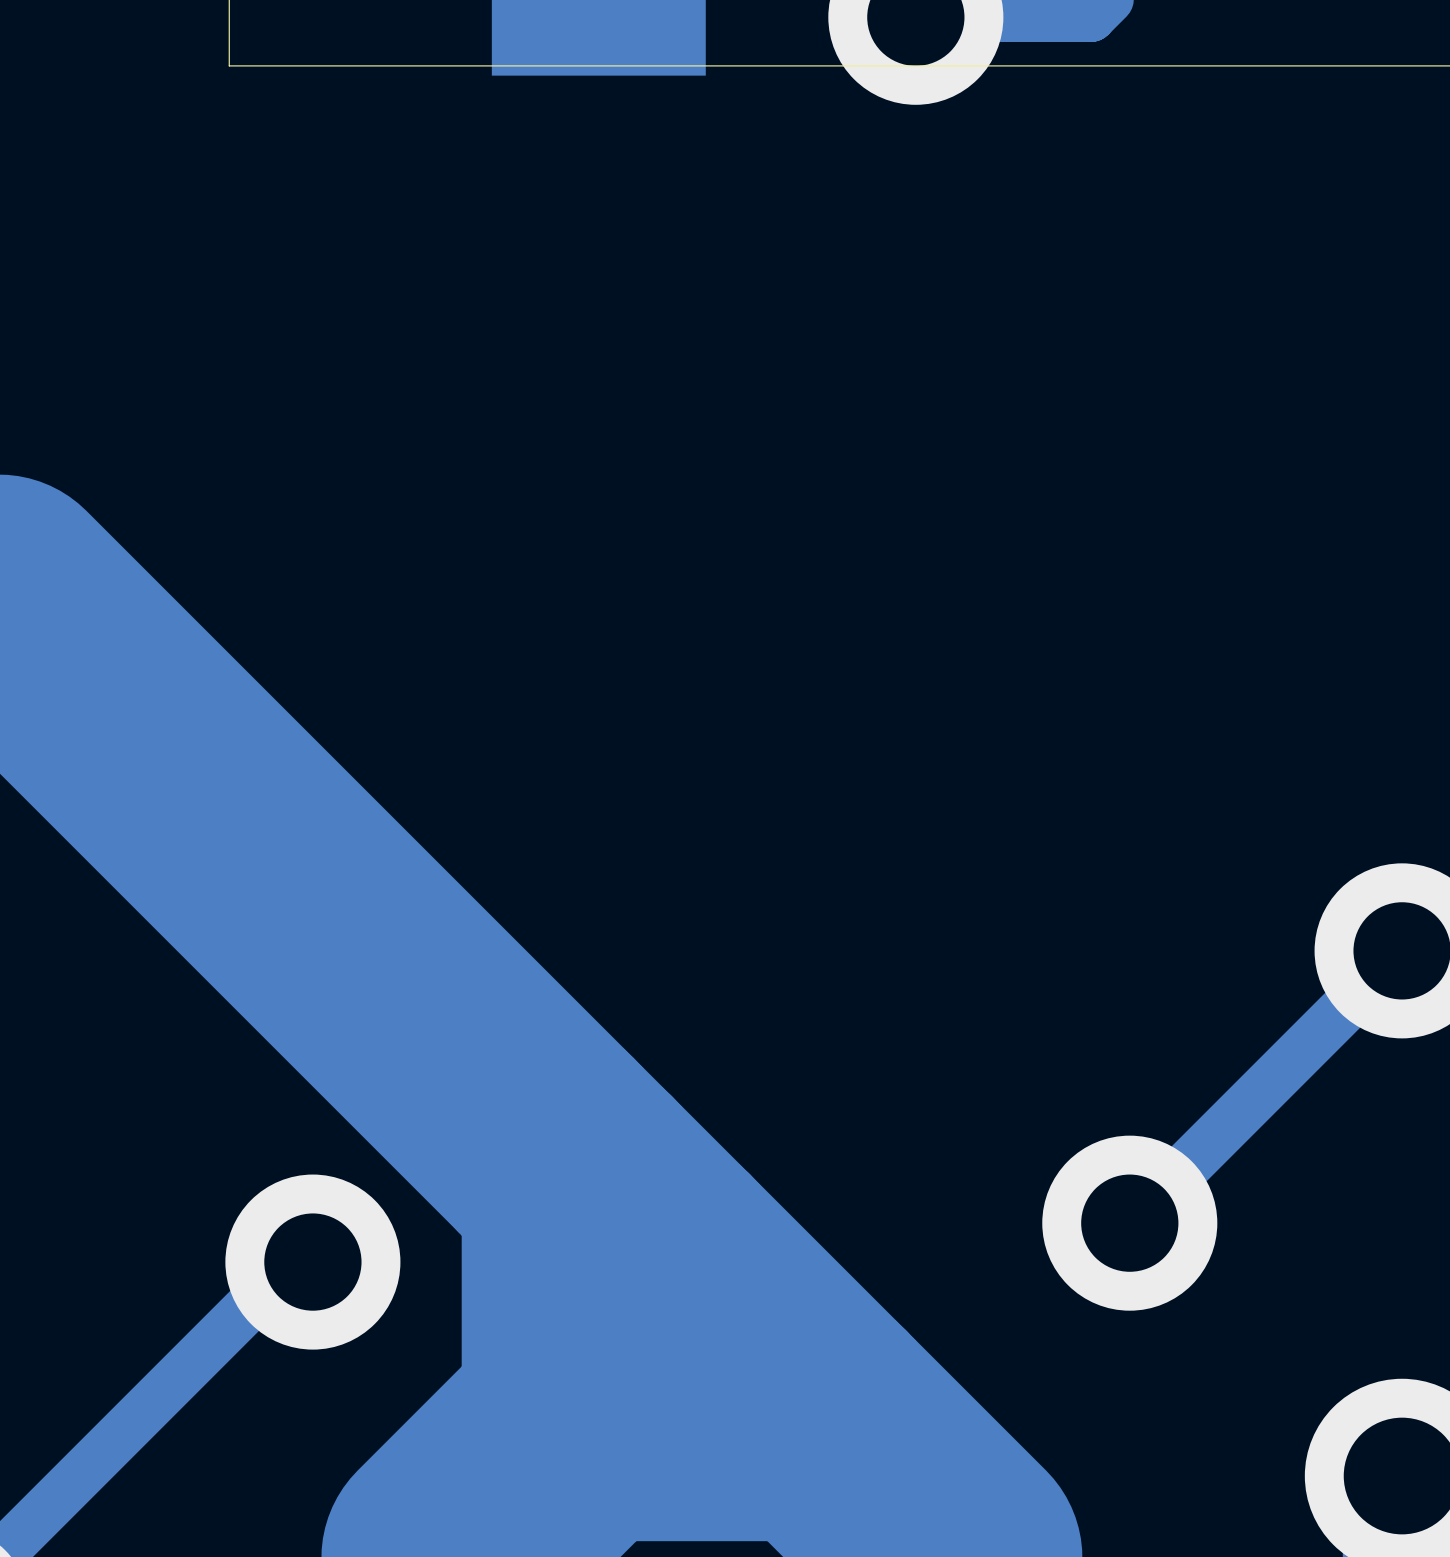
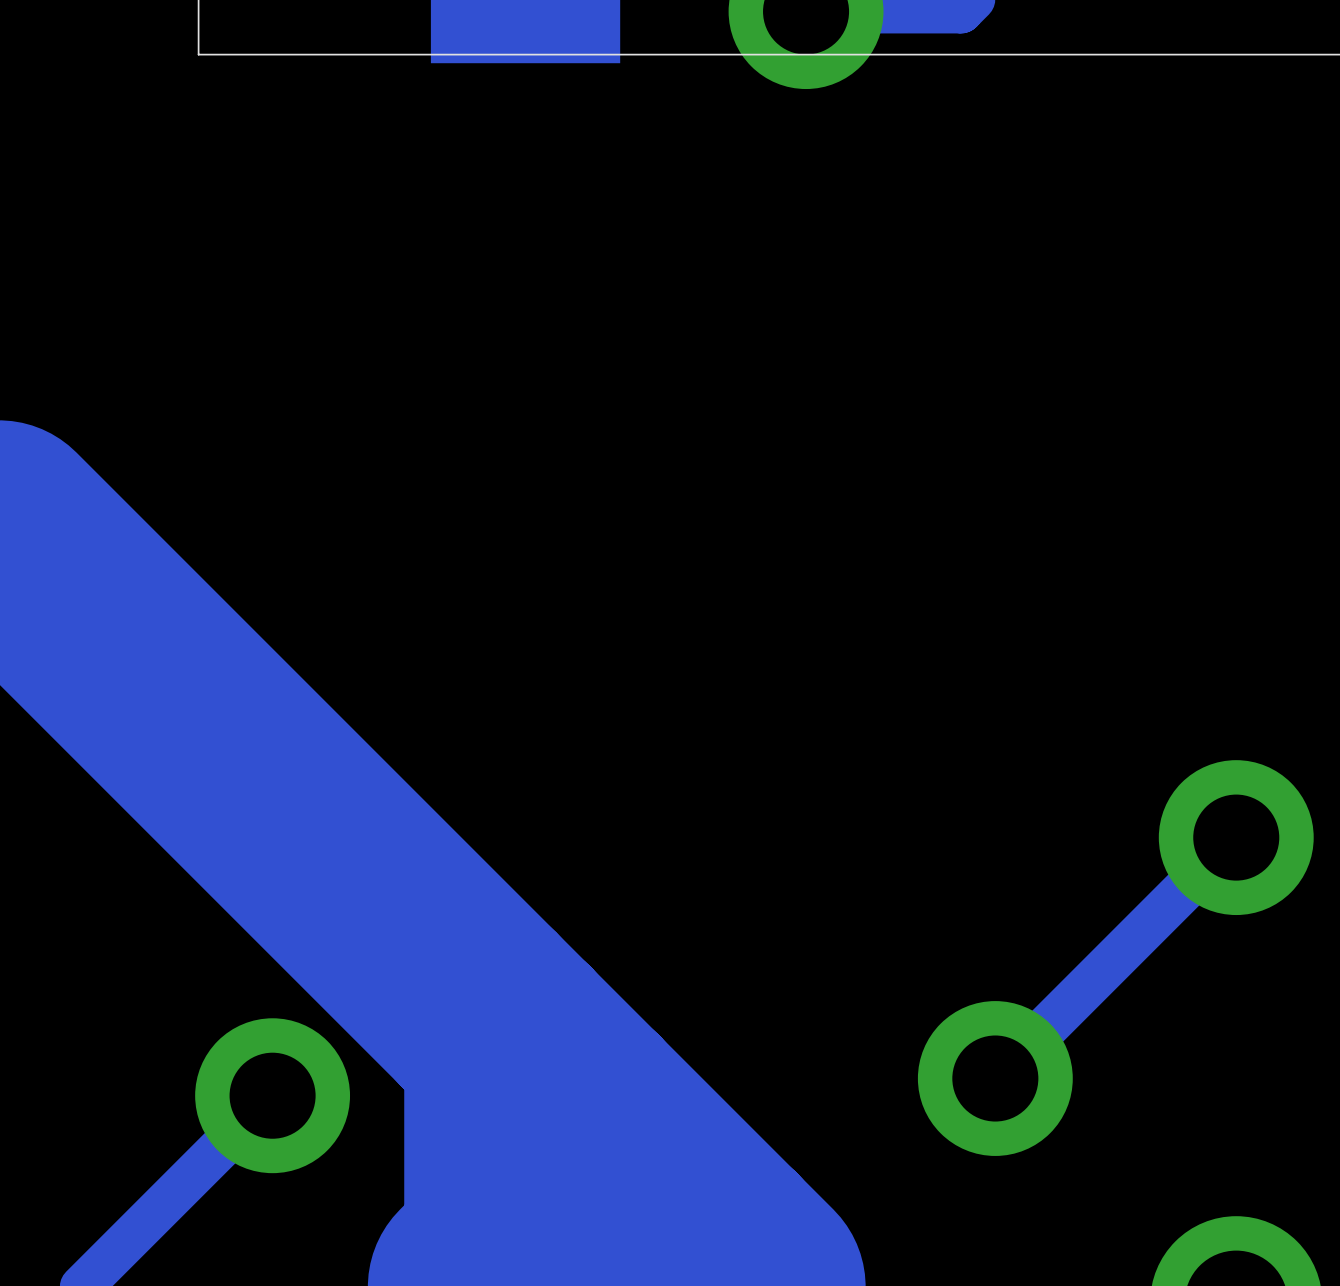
via position: (312, 1262) -> (272, 1095)

